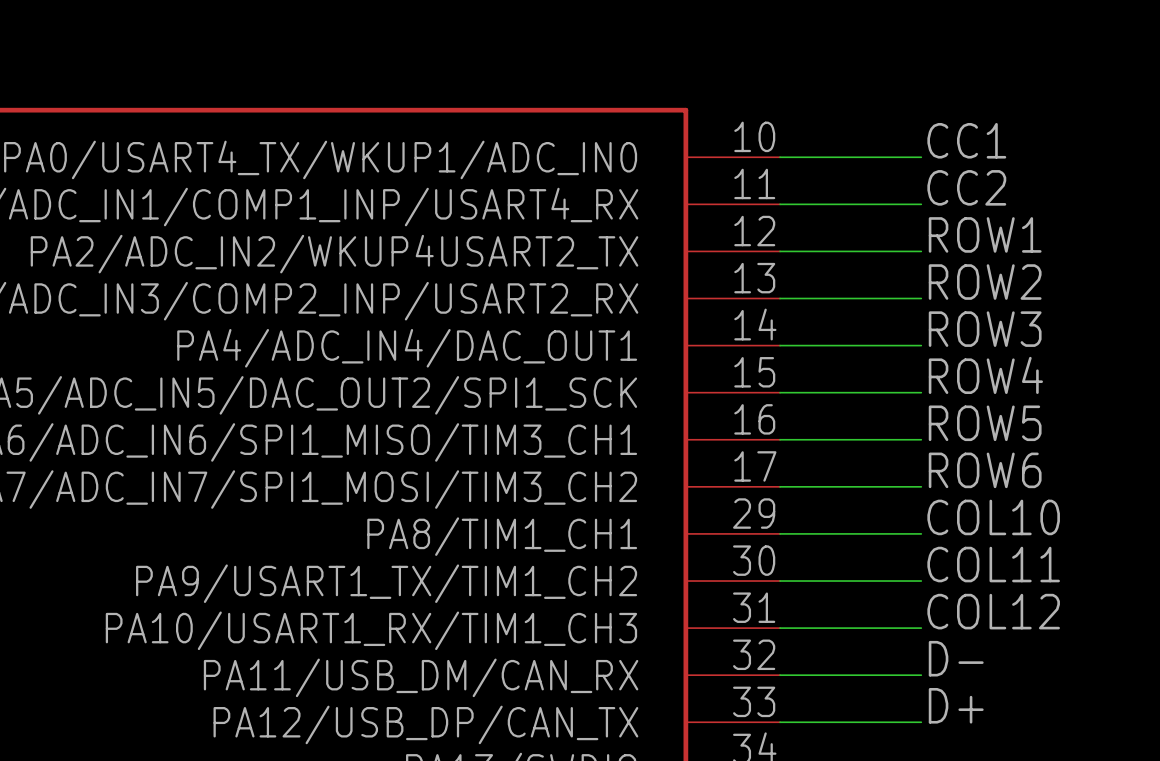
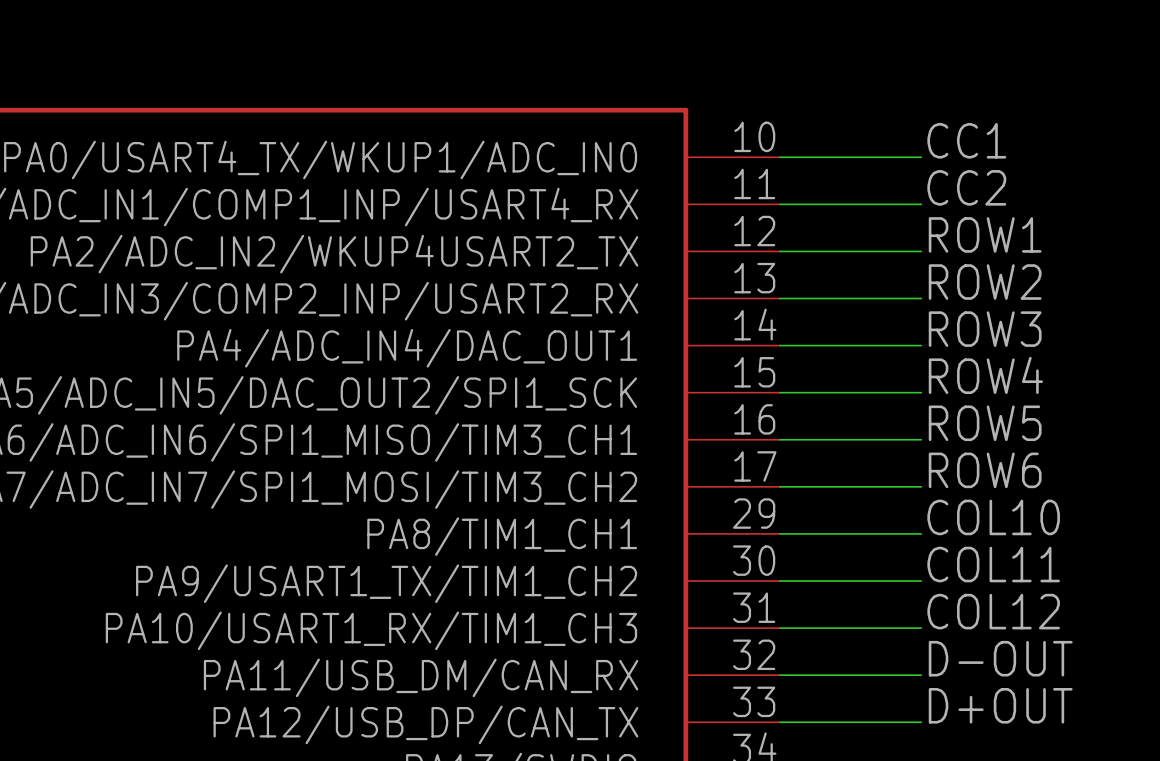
label: D- (956, 658) -> D-OUT (1000, 658)
label: D+ (956, 705) -> D+OUT (1000, 705)

